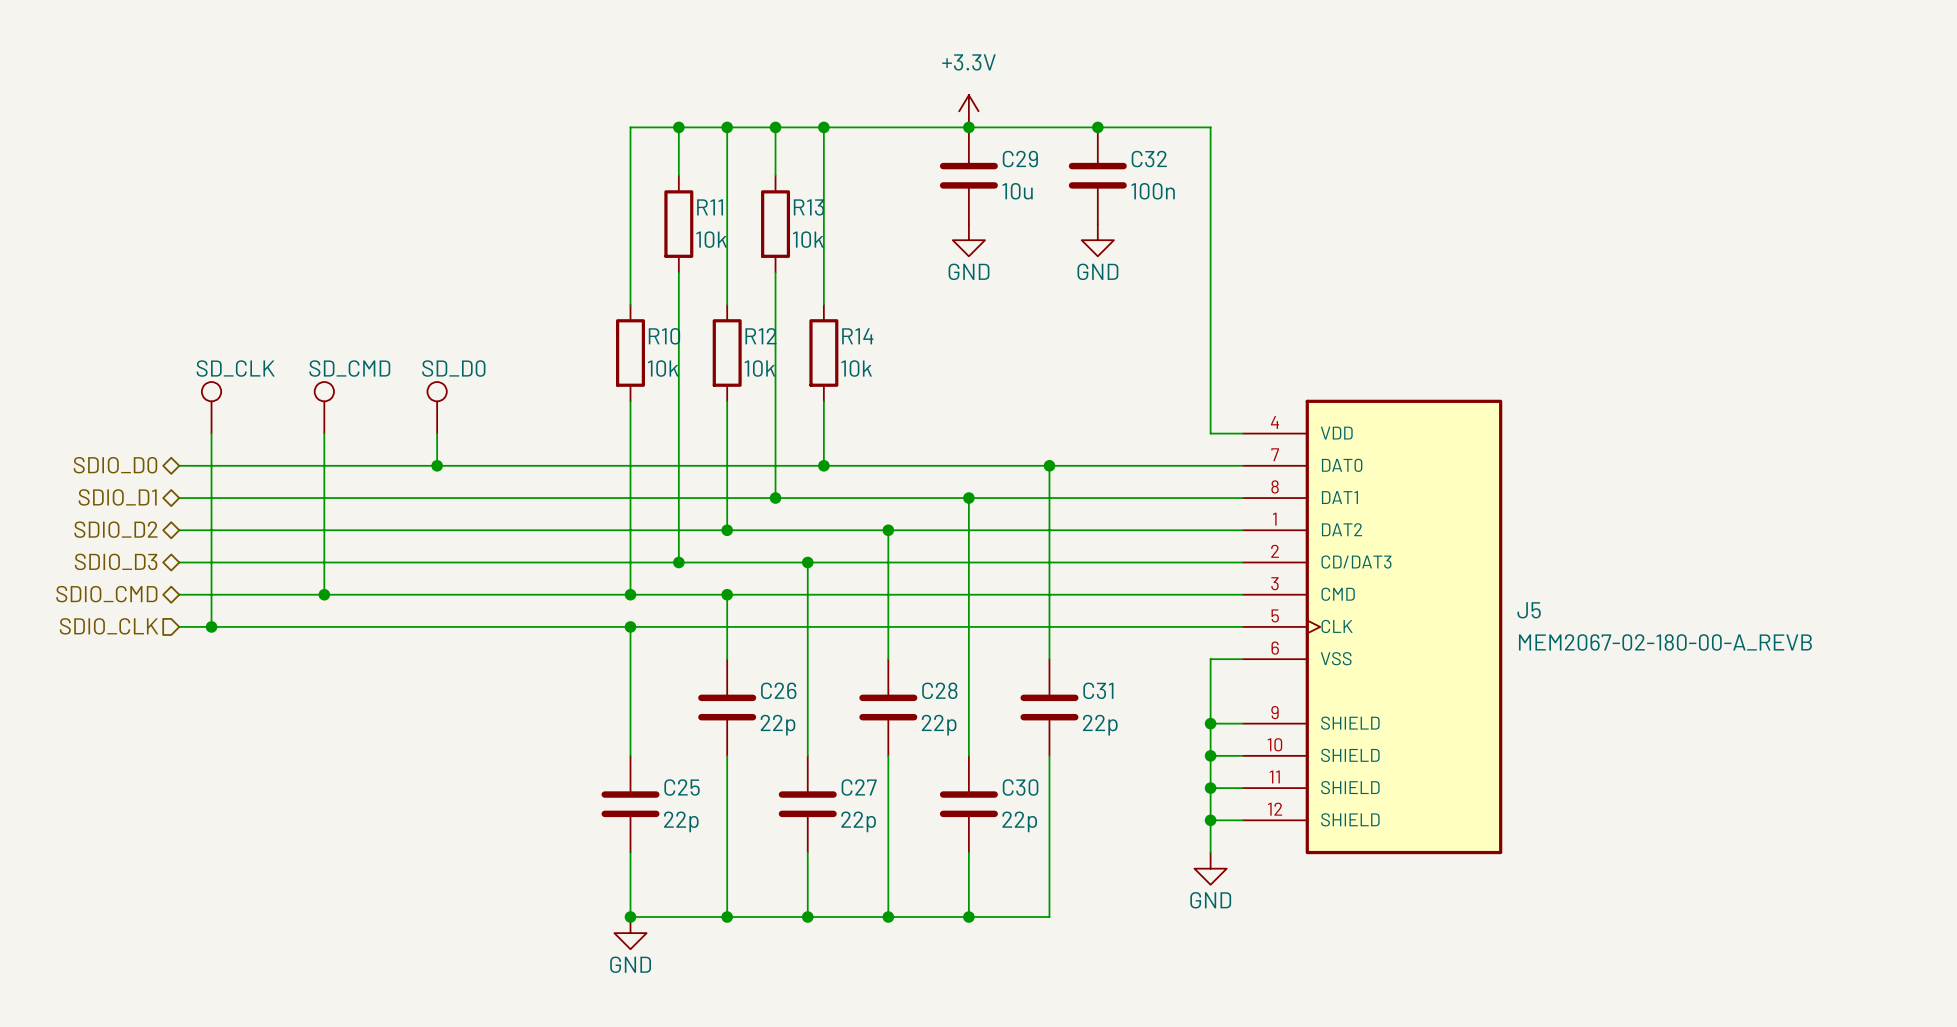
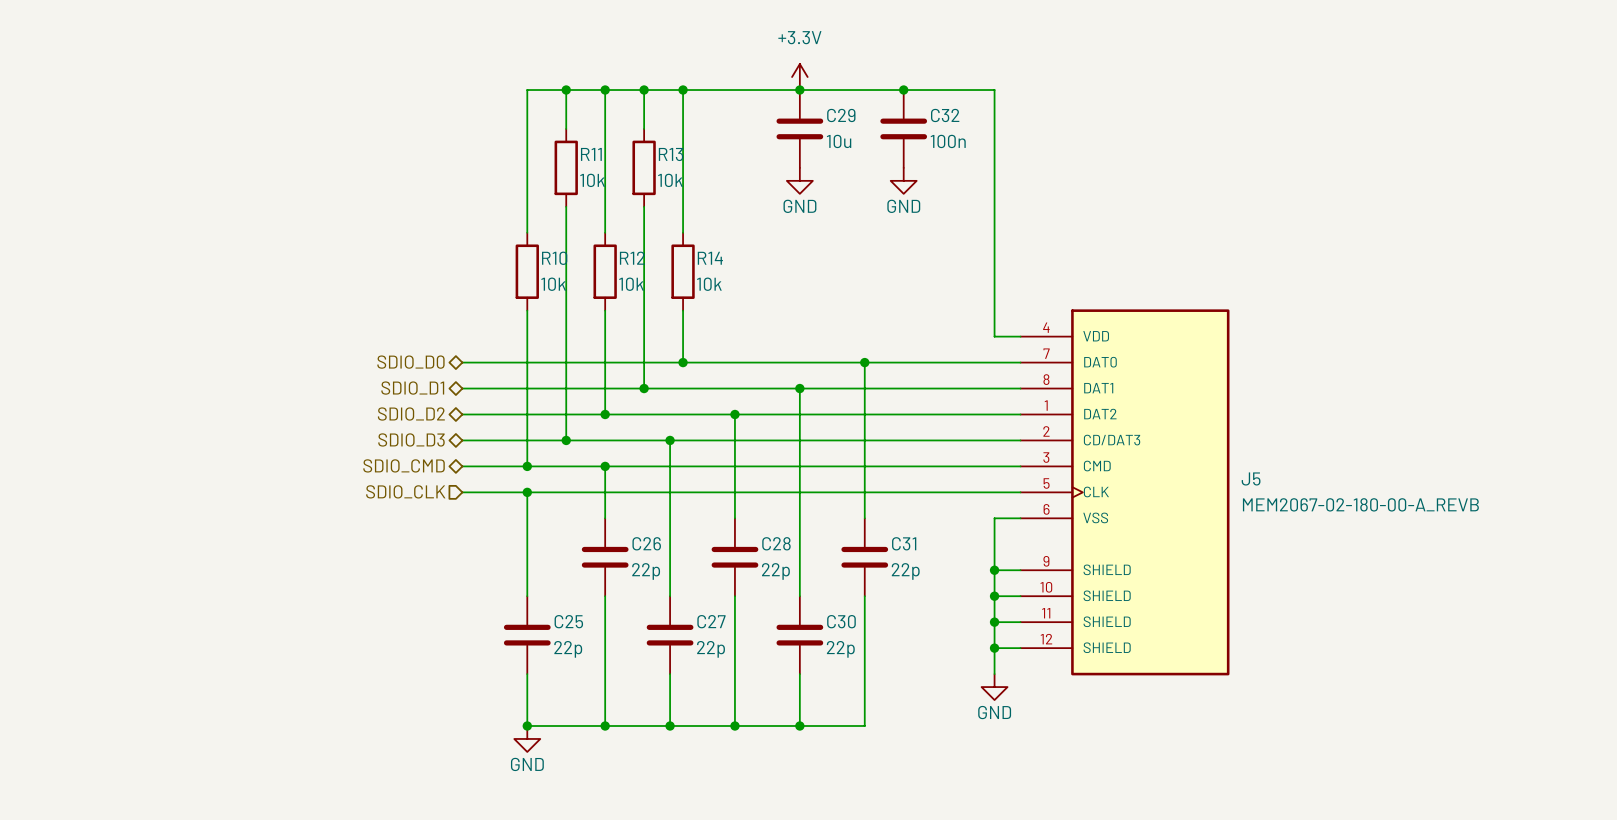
part: SD_CLK (211, 407) -> none
part: SD_CMD (324, 407) -> none
part: SD_D0 (437, 407) -> none
wire: (211, 433) (211, 626) -> none
wire: (324, 433) (324, 594) -> none
wire: (437, 433) (437, 465) -> none
hierarchical label: SDIO_D0 (115, 465) -> none
wire: (179, 465) (549, 465) -> none
junction: (437, 465) -> none
hierarchical label: none -> SDIO_D0 (410, 362)
hierarchical label: SDIO_D1 (117, 497) -> none
hierarchical label: none -> SDIO_D1 (412, 388)
wire: (179, 498) (549, 498) -> none
hierarchical label: SDIO_D2 (115, 529) -> none
hierarchical label: none -> SDIO_D2 (411, 414)
wire: (179, 530) (549, 530) -> none
hierarchical label: SDIO_D3 (116, 561) -> none
hierarchical label: none -> SDIO_D3 (411, 439)
wire: (179, 562) (549, 562) -> none
hierarchical label: SDIO_CMD (106, 594) -> none
wire: (179, 594) (549, 594) -> none
junction: (324, 594) -> none
hierarchical label: none -> SDIO_CMD (404, 465)
hierarchical label: SDIO_CLK (109, 626) -> none
wire: (179, 626) (549, 626) -> none
junction: (211, 626) -> none
hierarchical label: none -> SDIO_CLK (405, 491)

